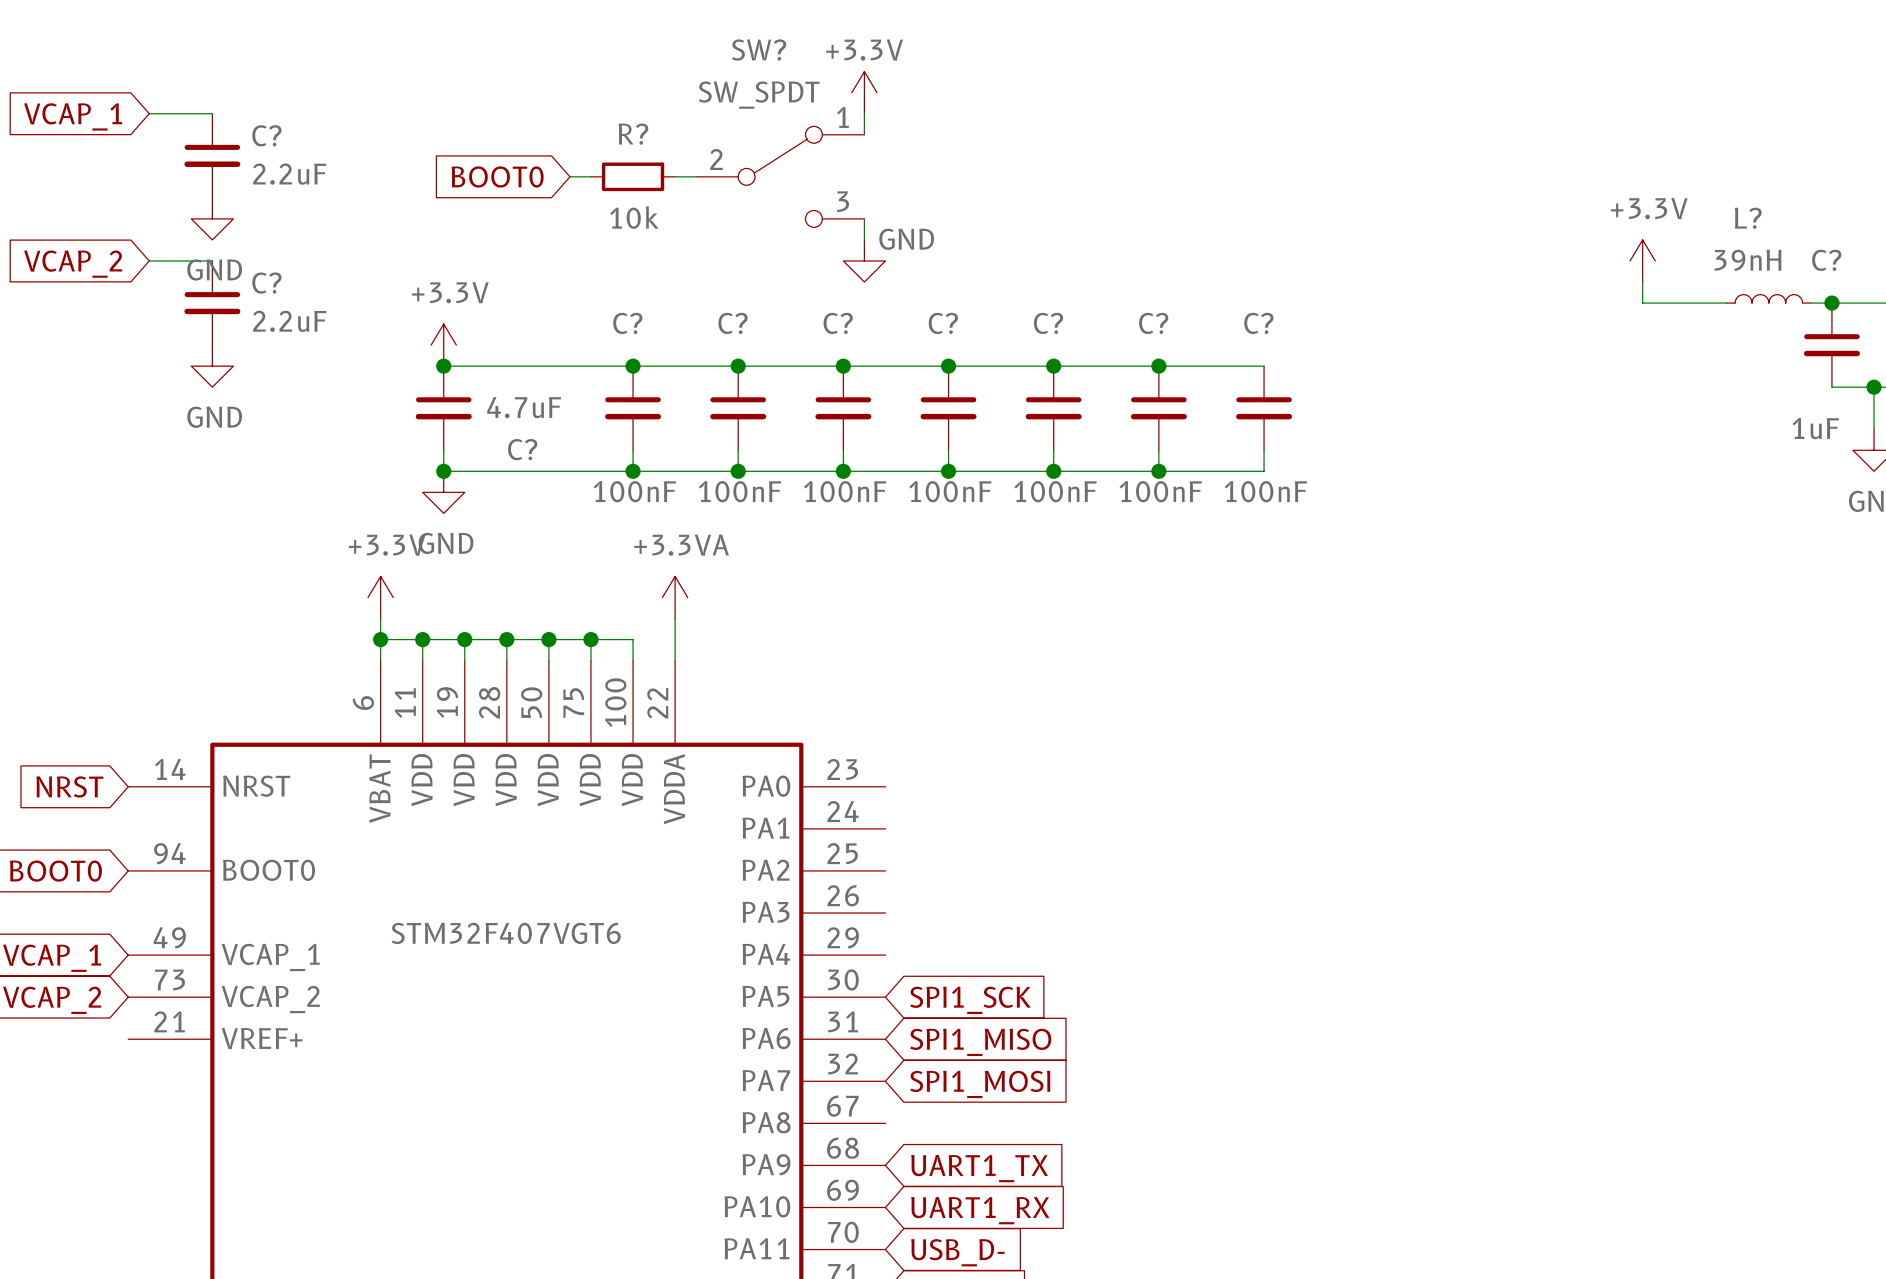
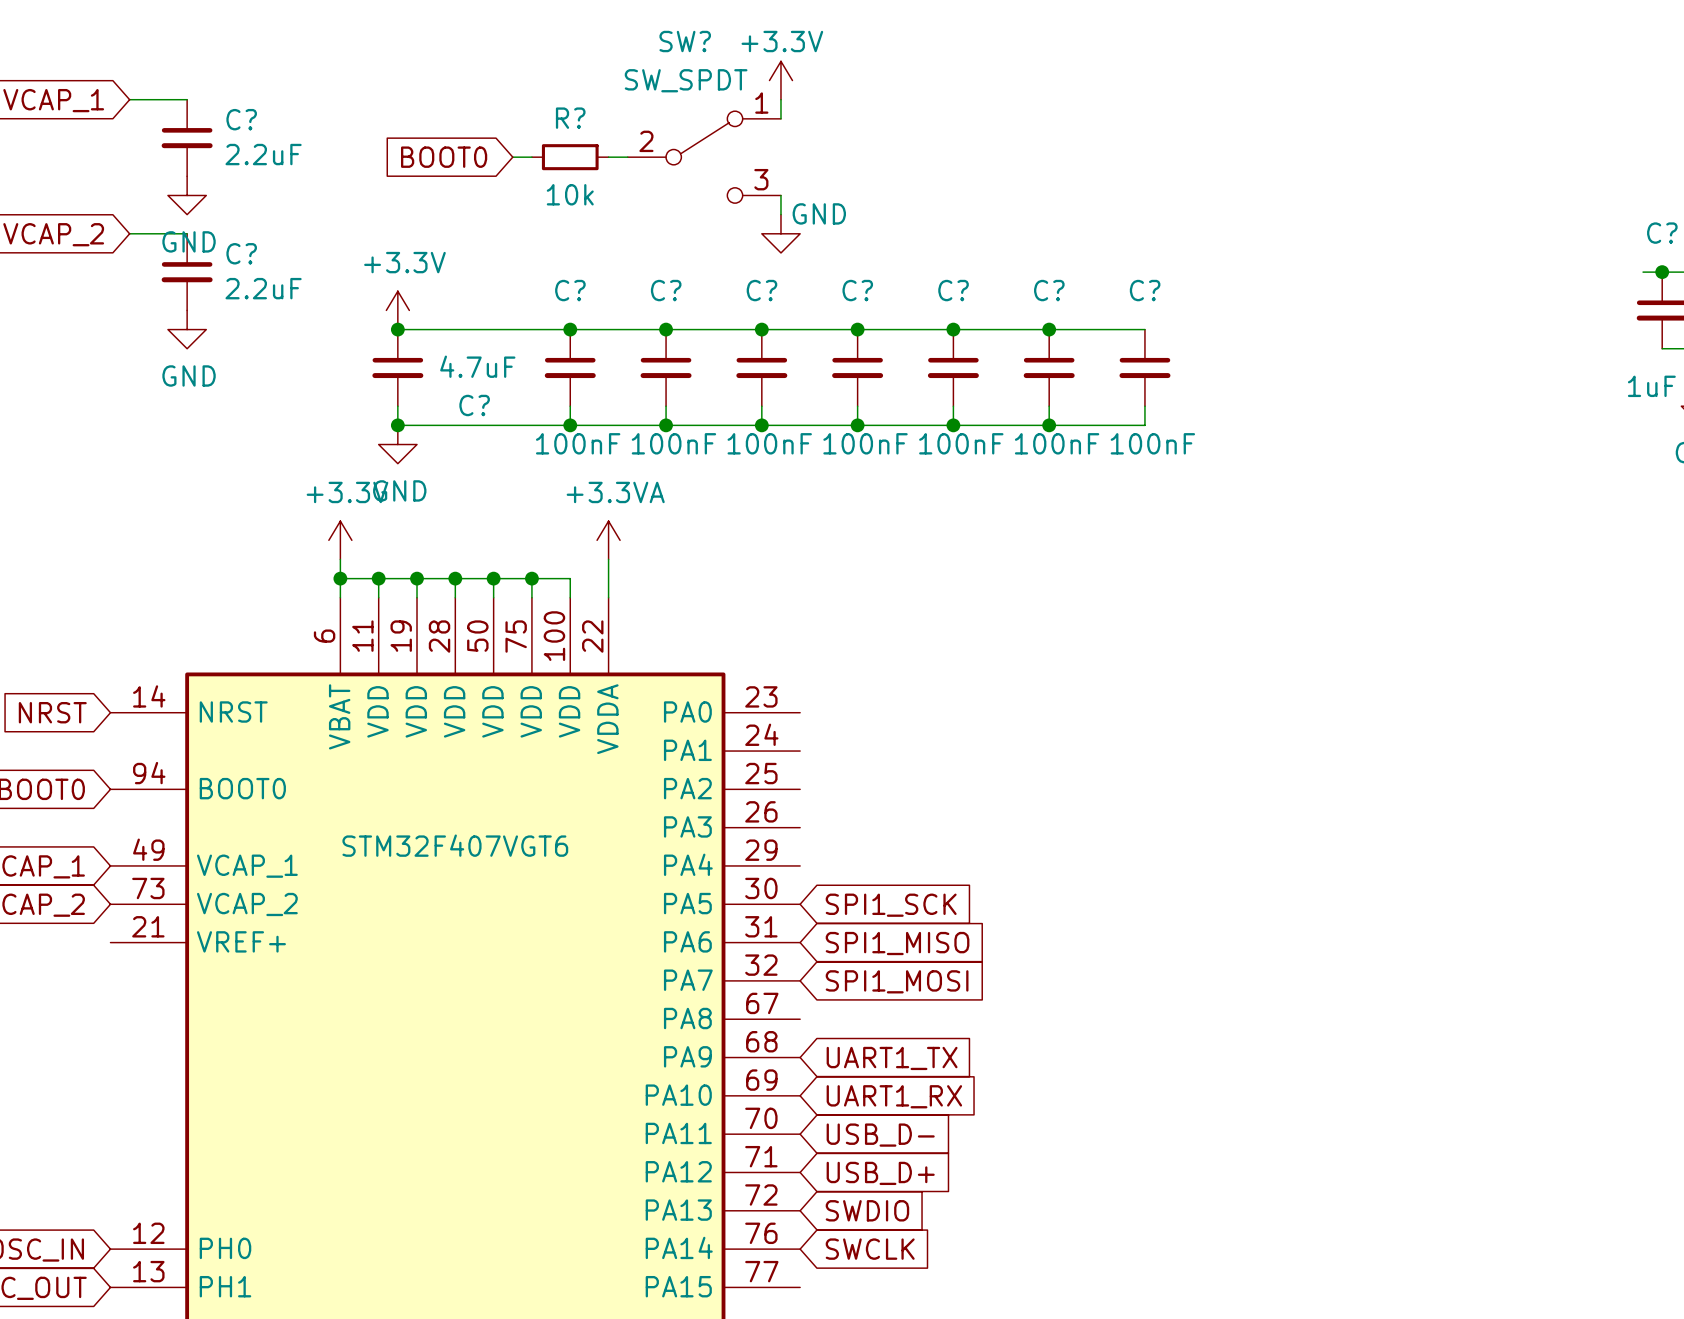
power symbol: +3.3V (1642, 260) -> none
wire: (1642, 282) (1642, 303) (1726, 303) -> none
L?: 39nH (1768, 298) -> none

